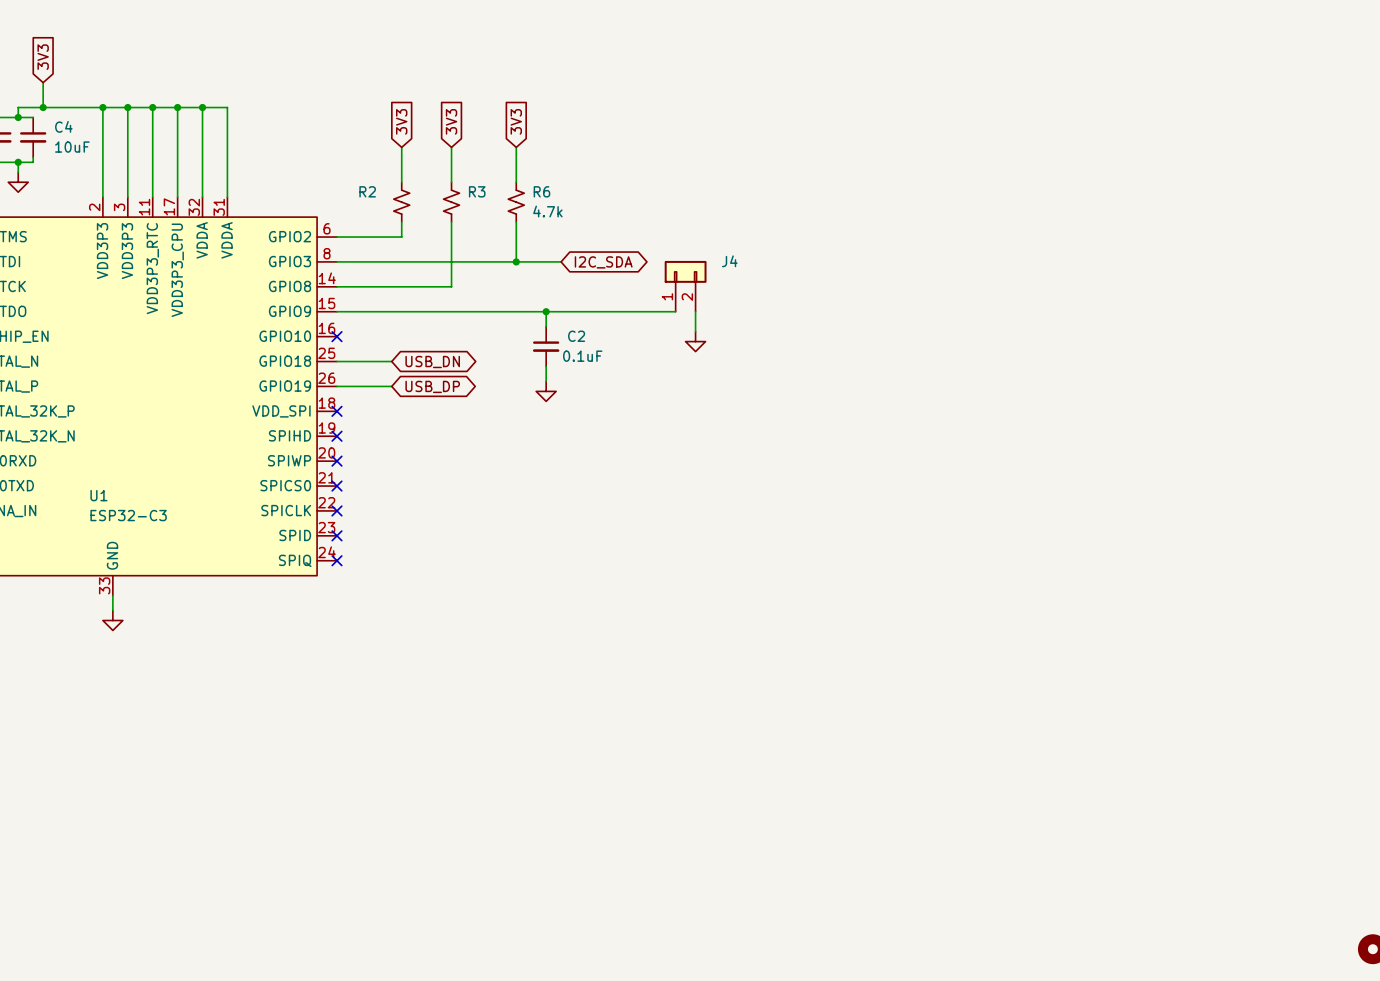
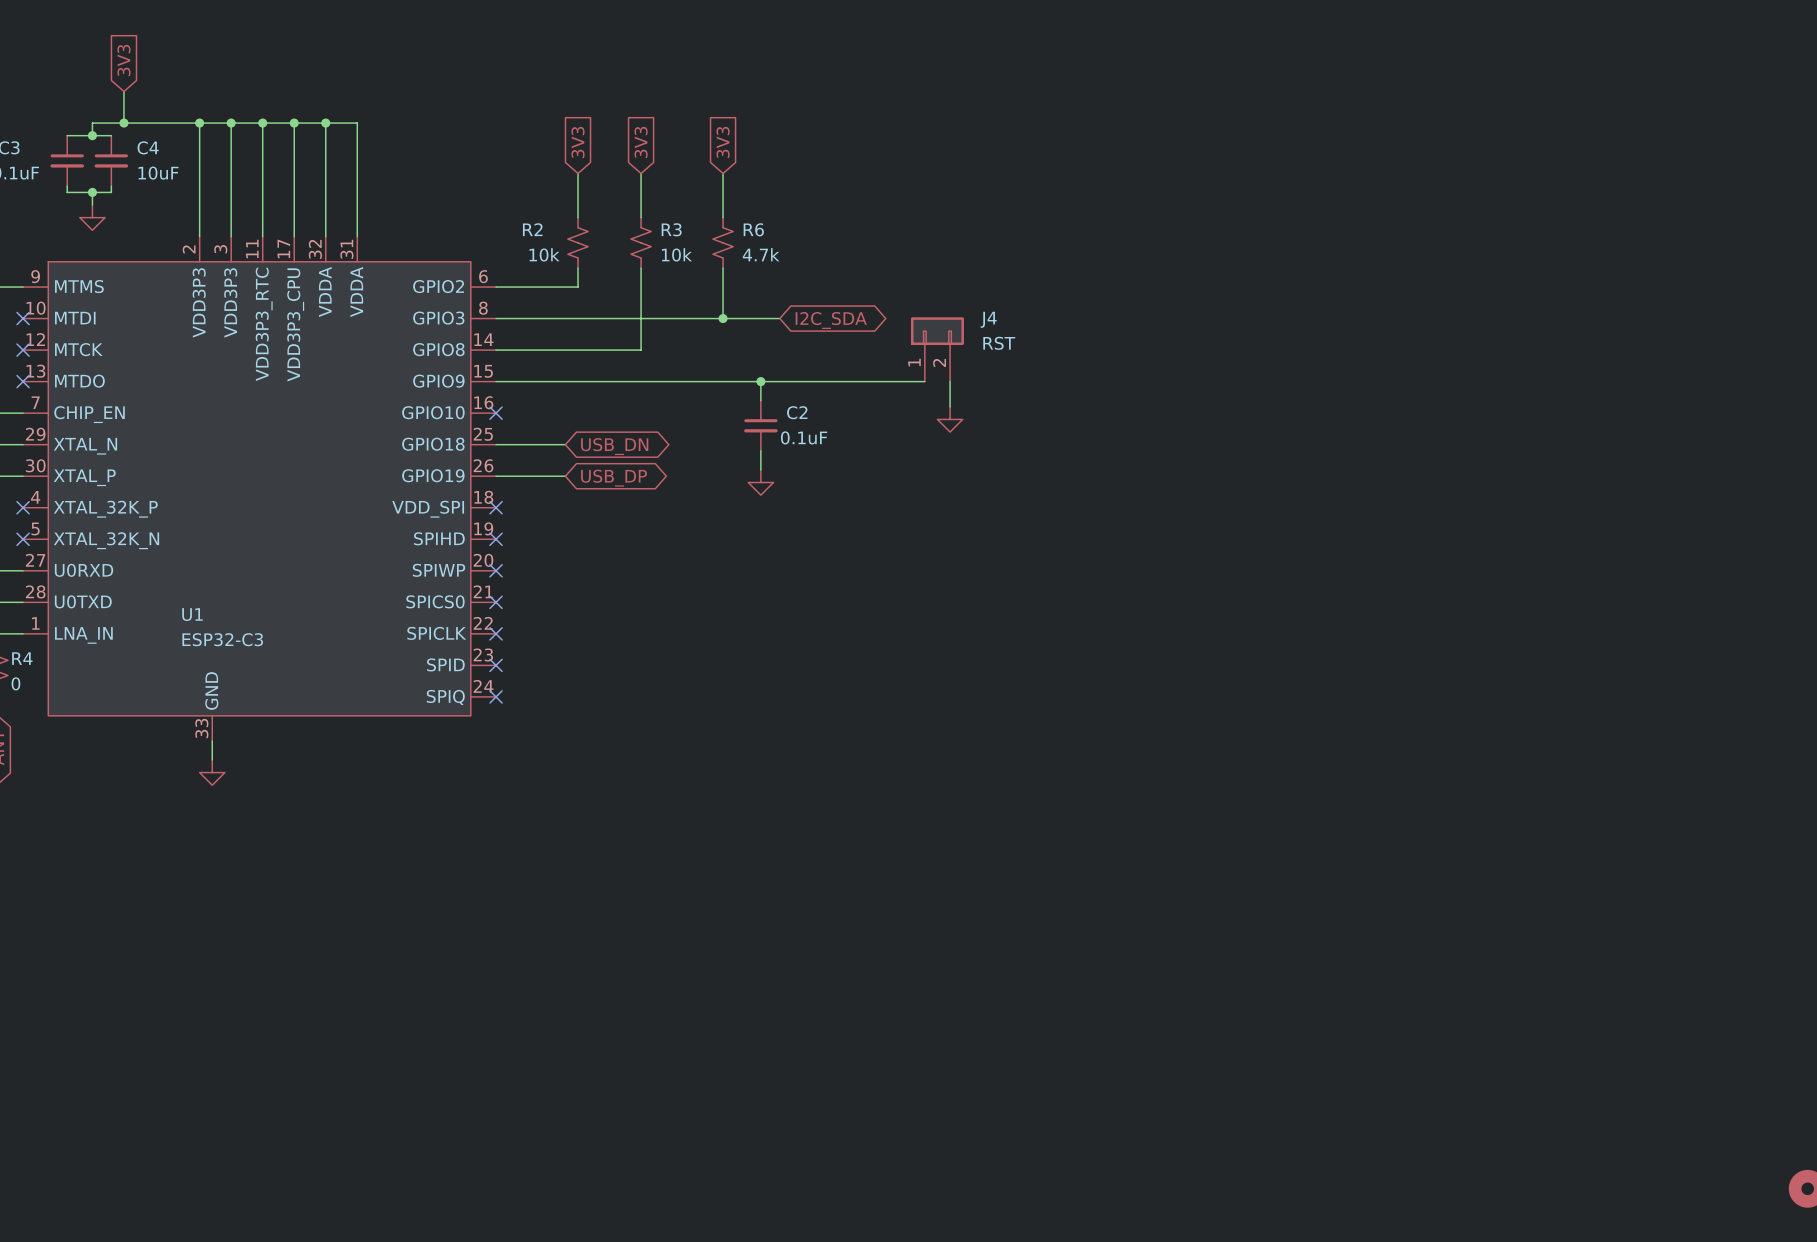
R2 value: none -> 10k (544, 254)
R3 value: none -> 10k (676, 254)
J4 value: none -> RST (999, 343)

